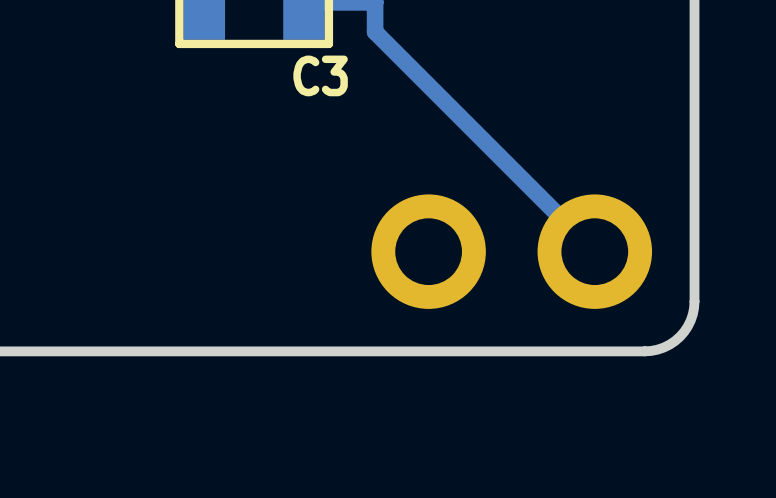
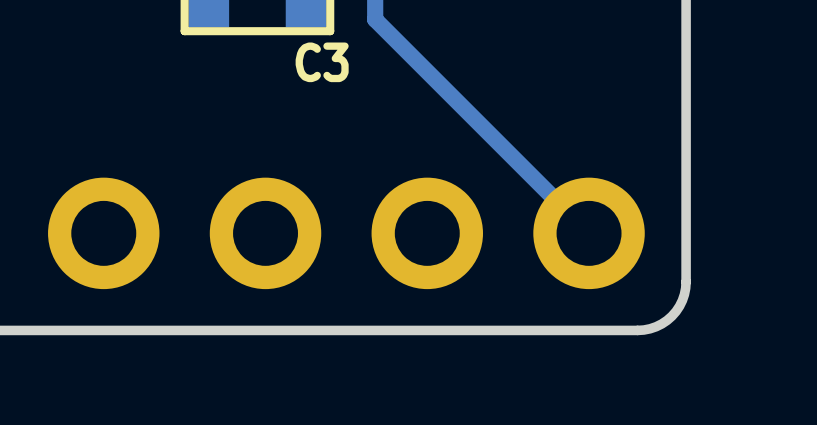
part: none -> (103, 233)
part: none -> (265, 233)

